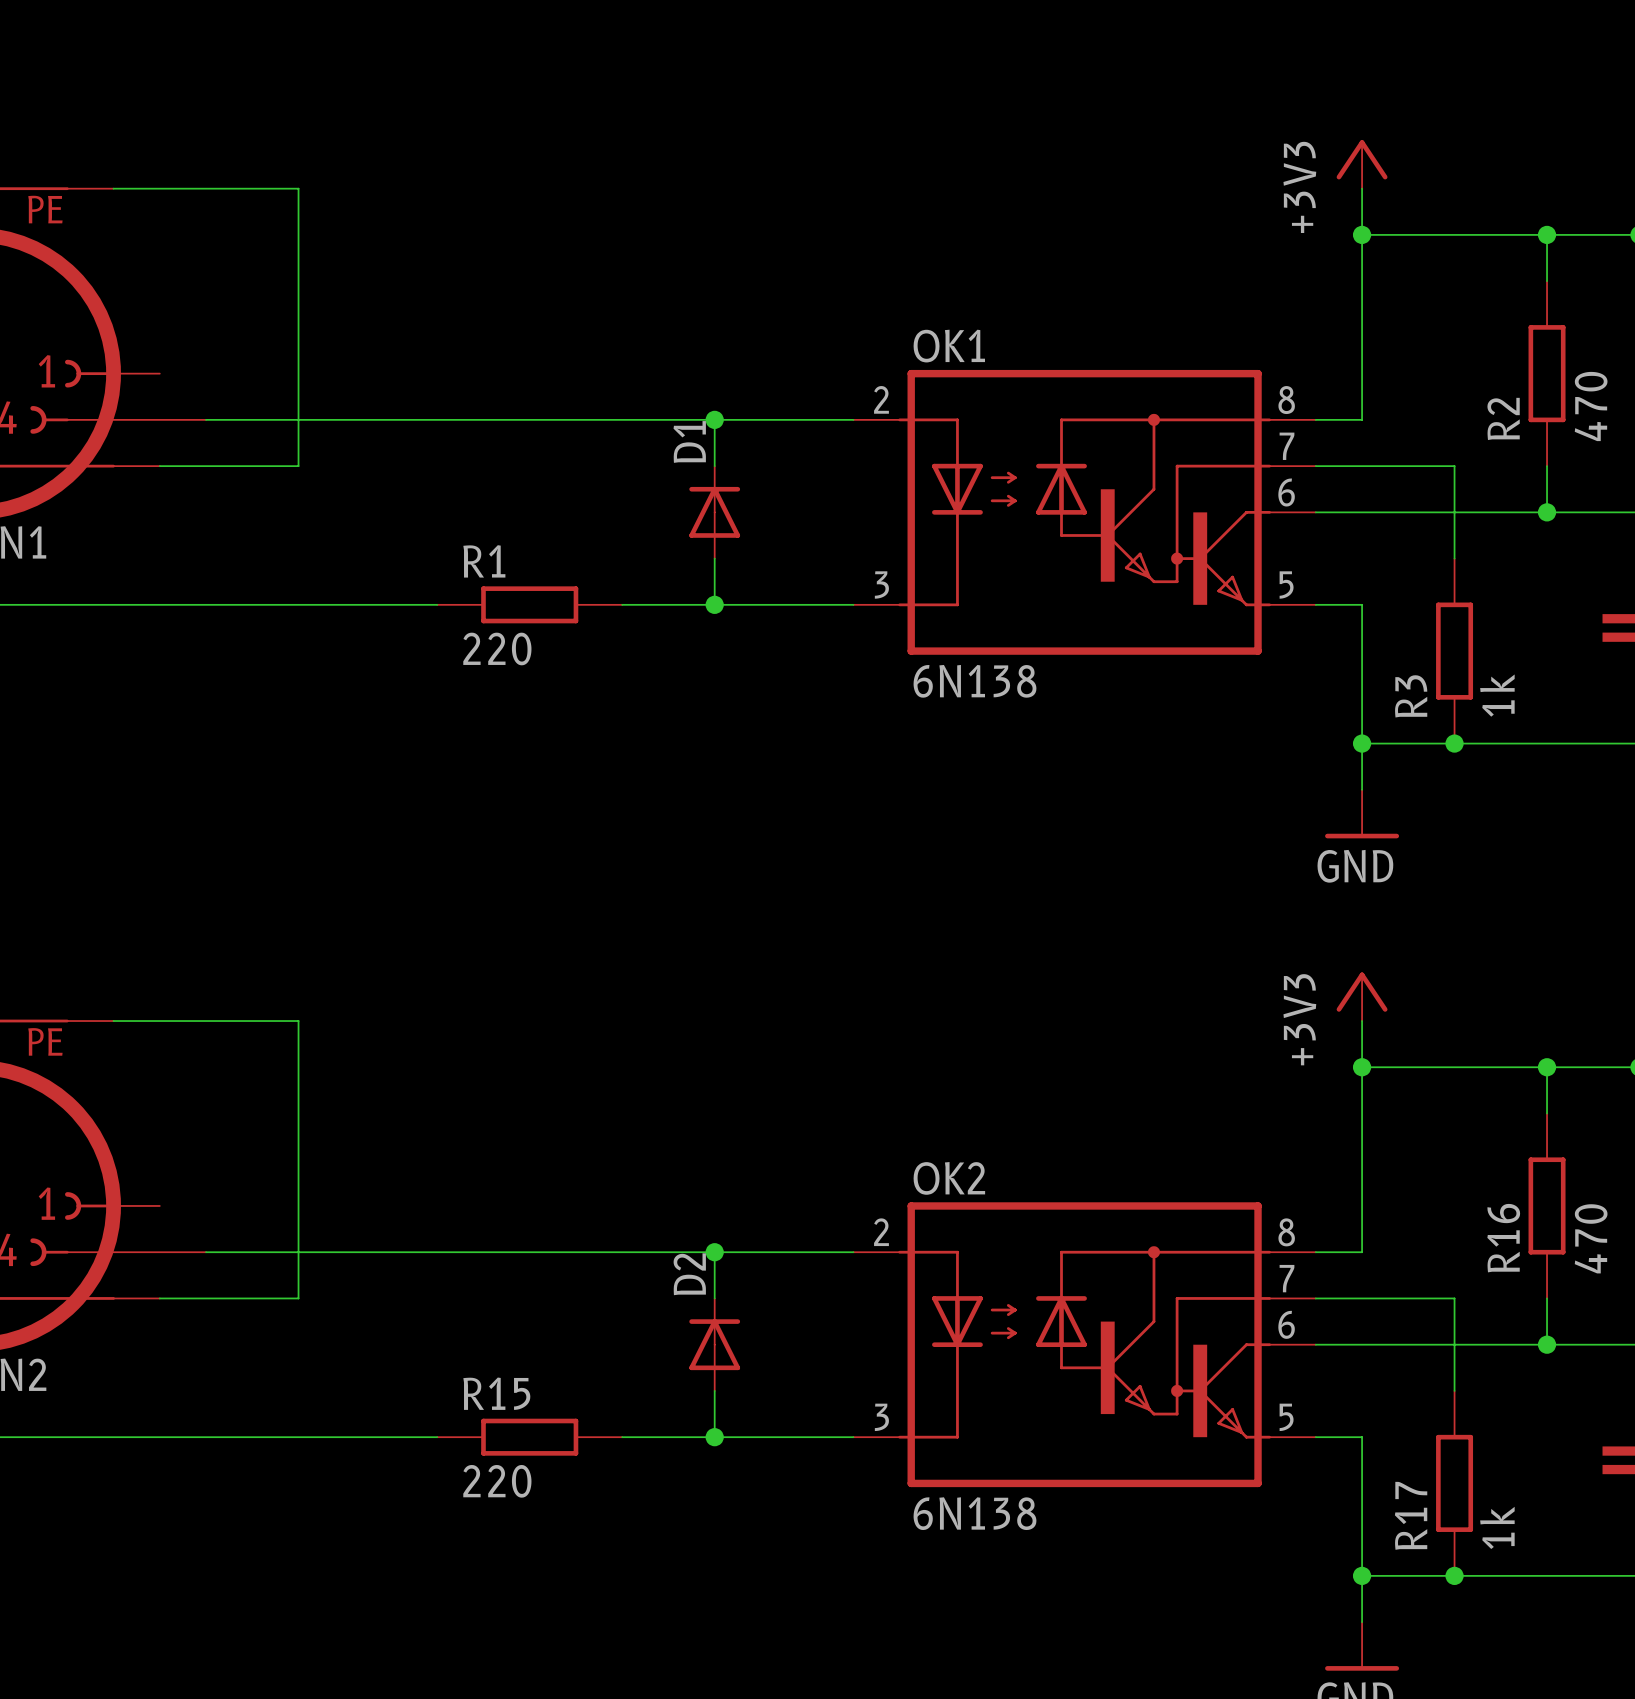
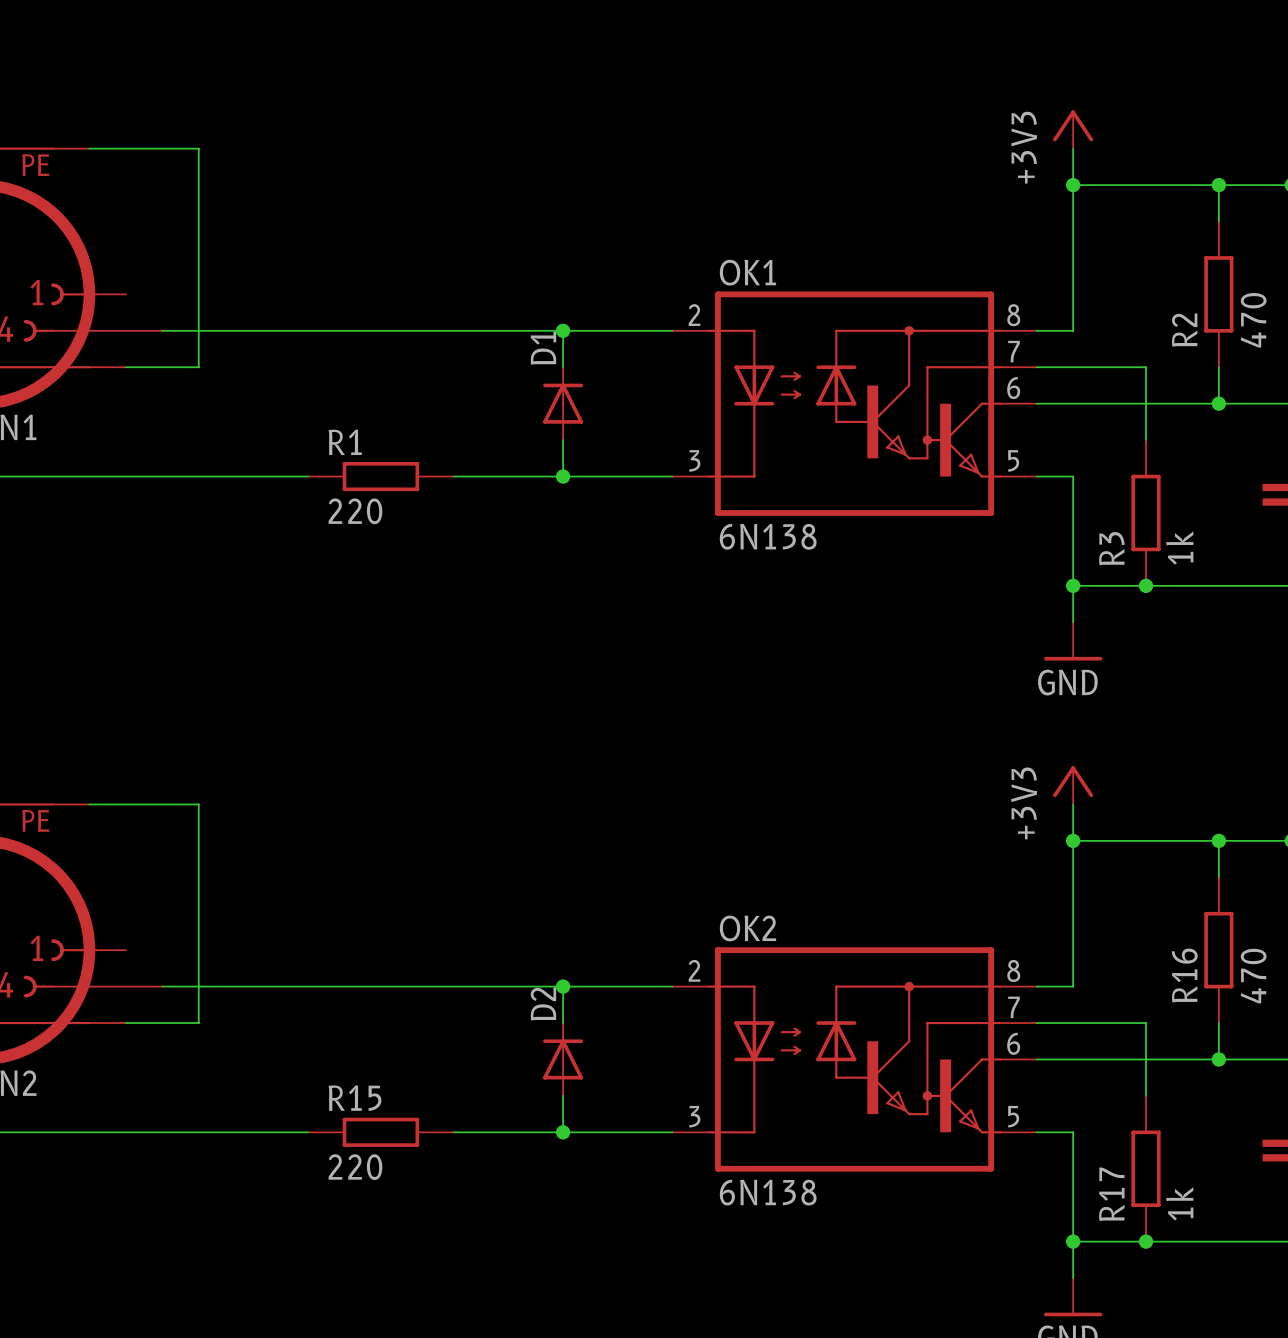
wire: (252, 188) (298, 188) (298, 466) (252, 466) -> (198, 148) (198, 367)
R1 position: (529, 604) -> (380, 476)
wire: (252, 1021) (298, 1021) (298, 1298) (252, 1298) -> (198, 804) (198, 1023)
R15 position: (529, 1437) -> (380, 1132)

